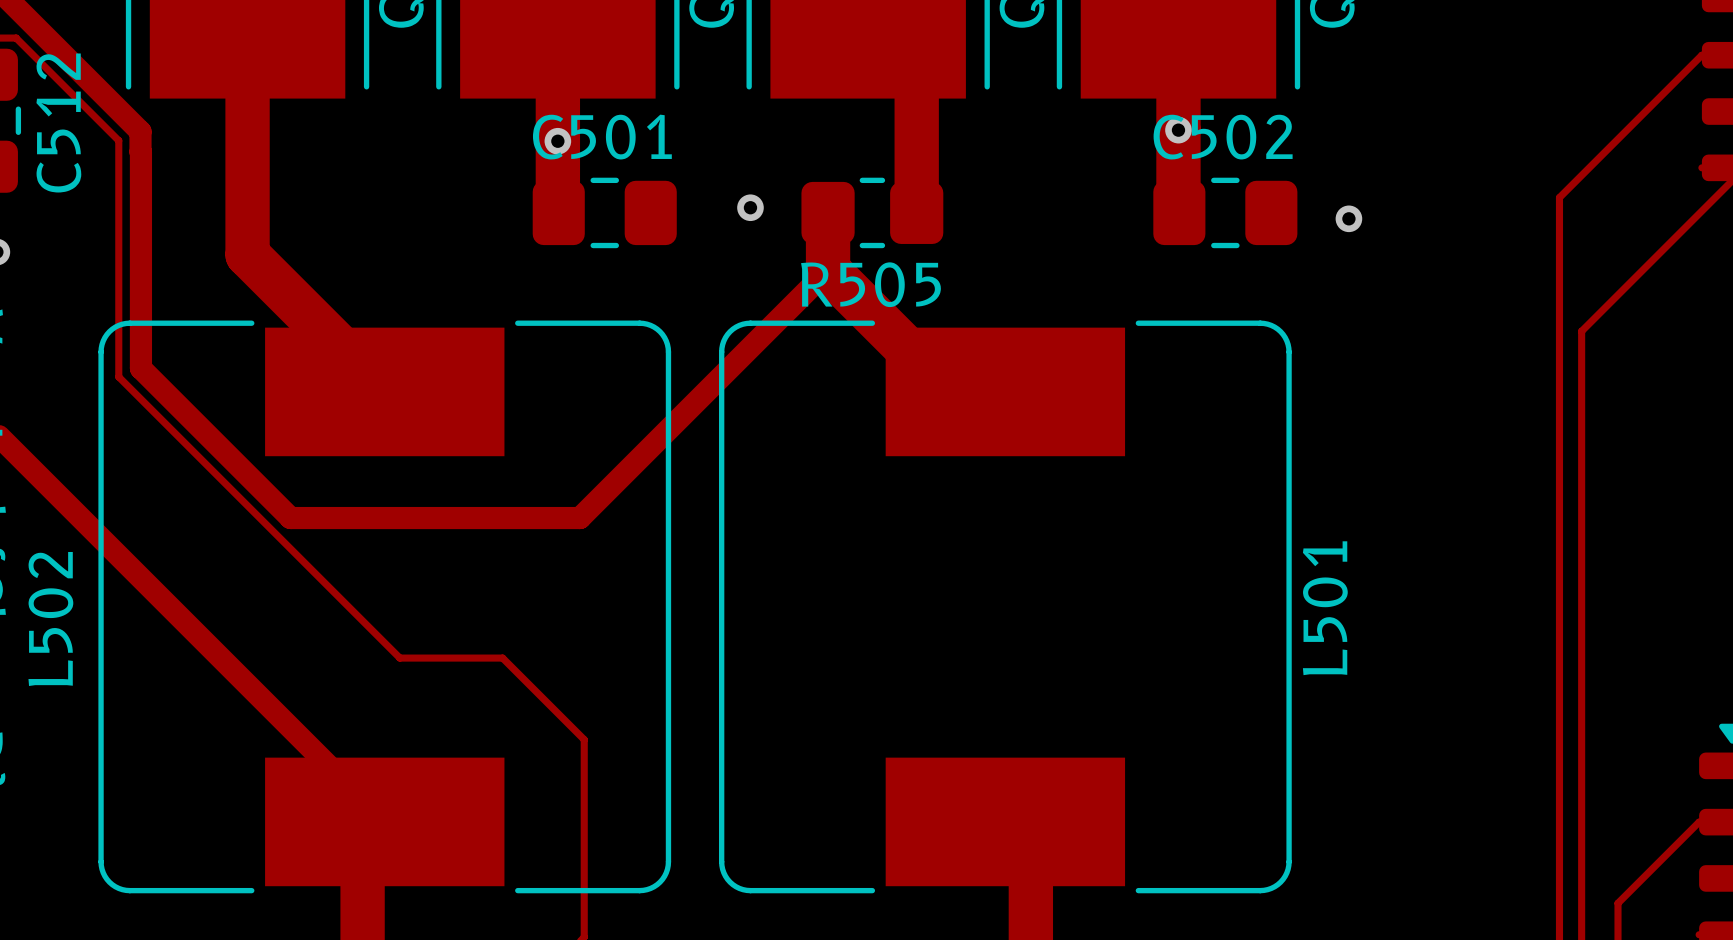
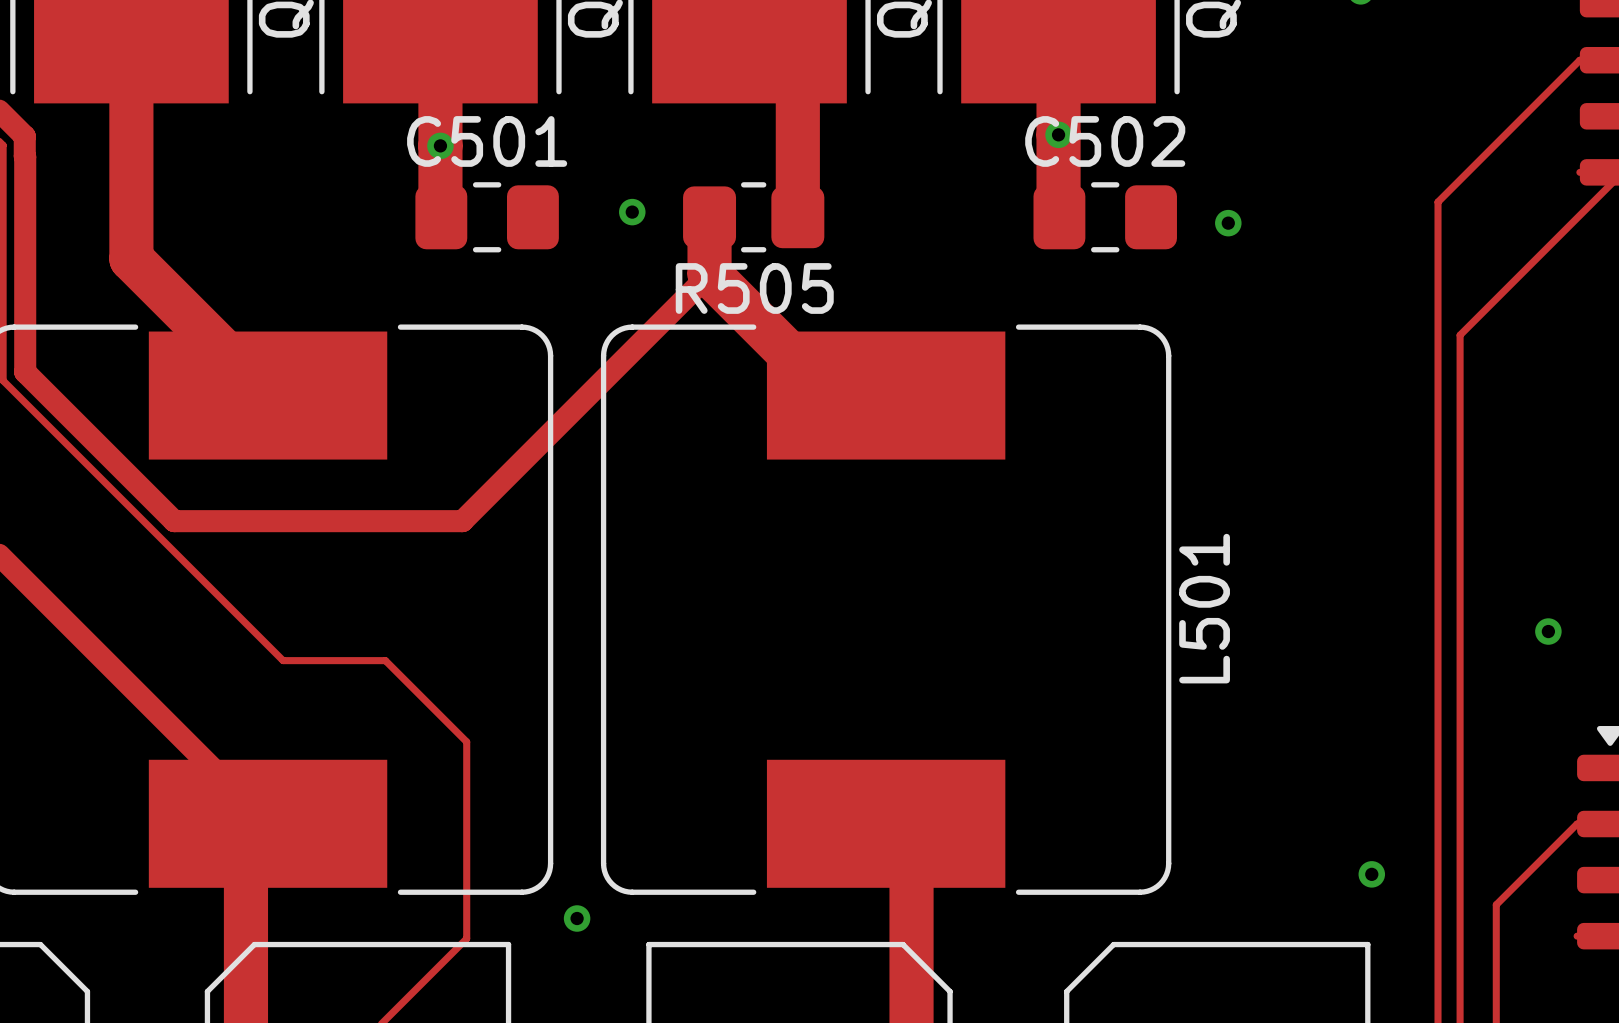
via: none -> (1548, 631)
via: none -> (1371, 874)
via: none -> (577, 918)

